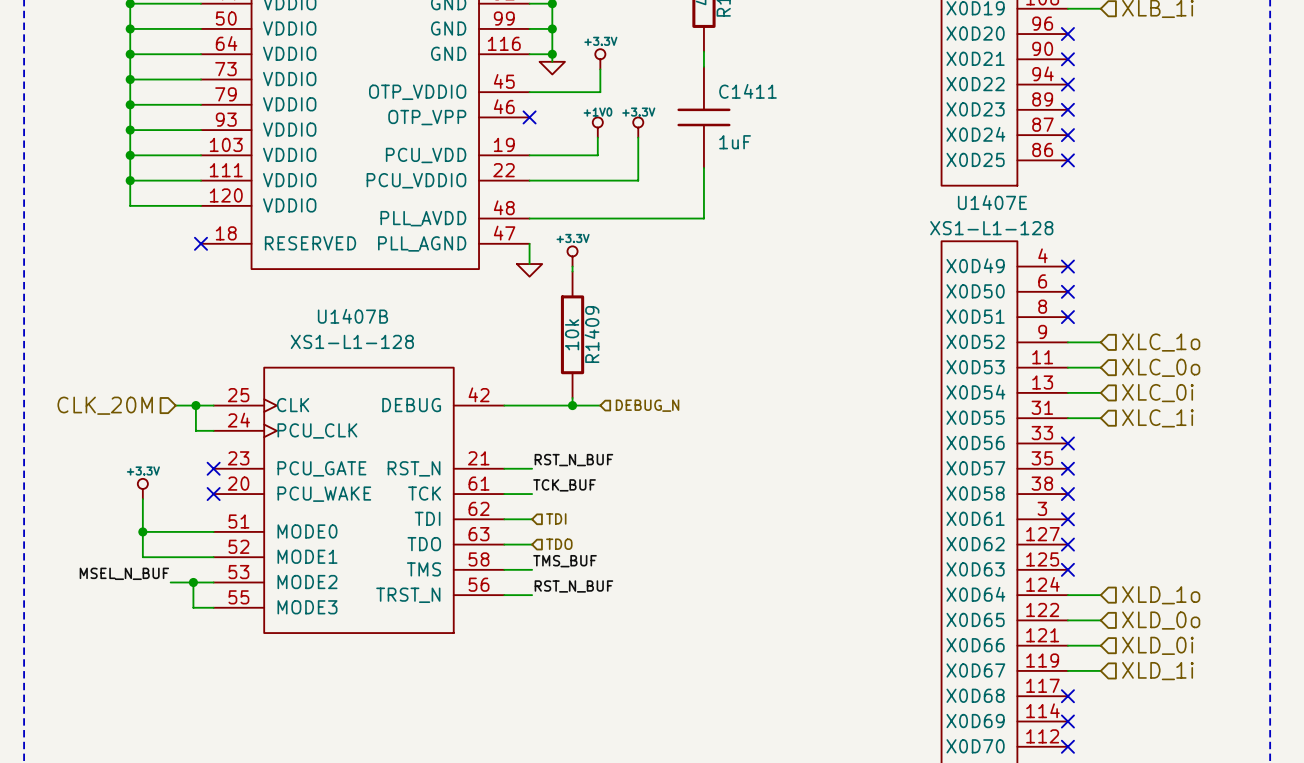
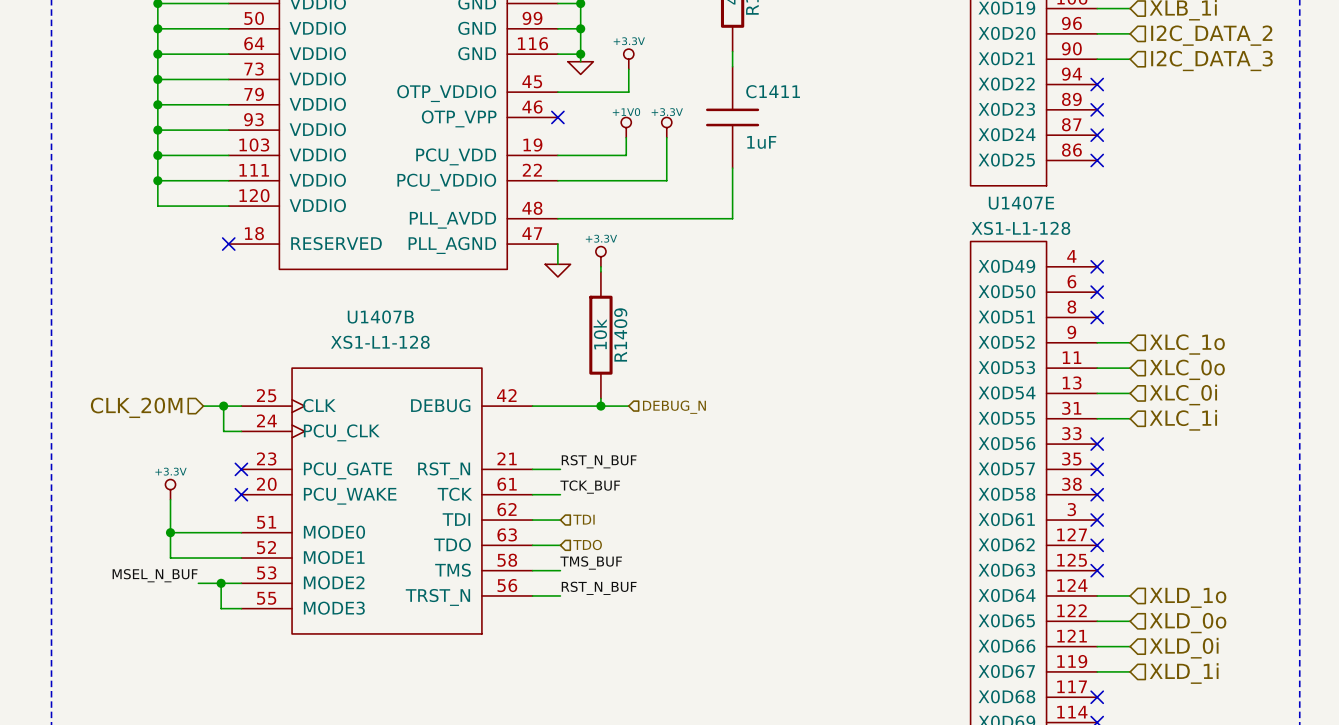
wire: none -> (1097, 33) (1130, 33)
no-connect mark: (1067, 34) -> none
hierarchical label: none -> I2C_DATA_2 (1211, 35)
wire: none -> (1097, 59) (1130, 59)
no-connect mark: (1067, 59) -> none
hierarchical label: none -> I2C_DATA_3 (1211, 60)

